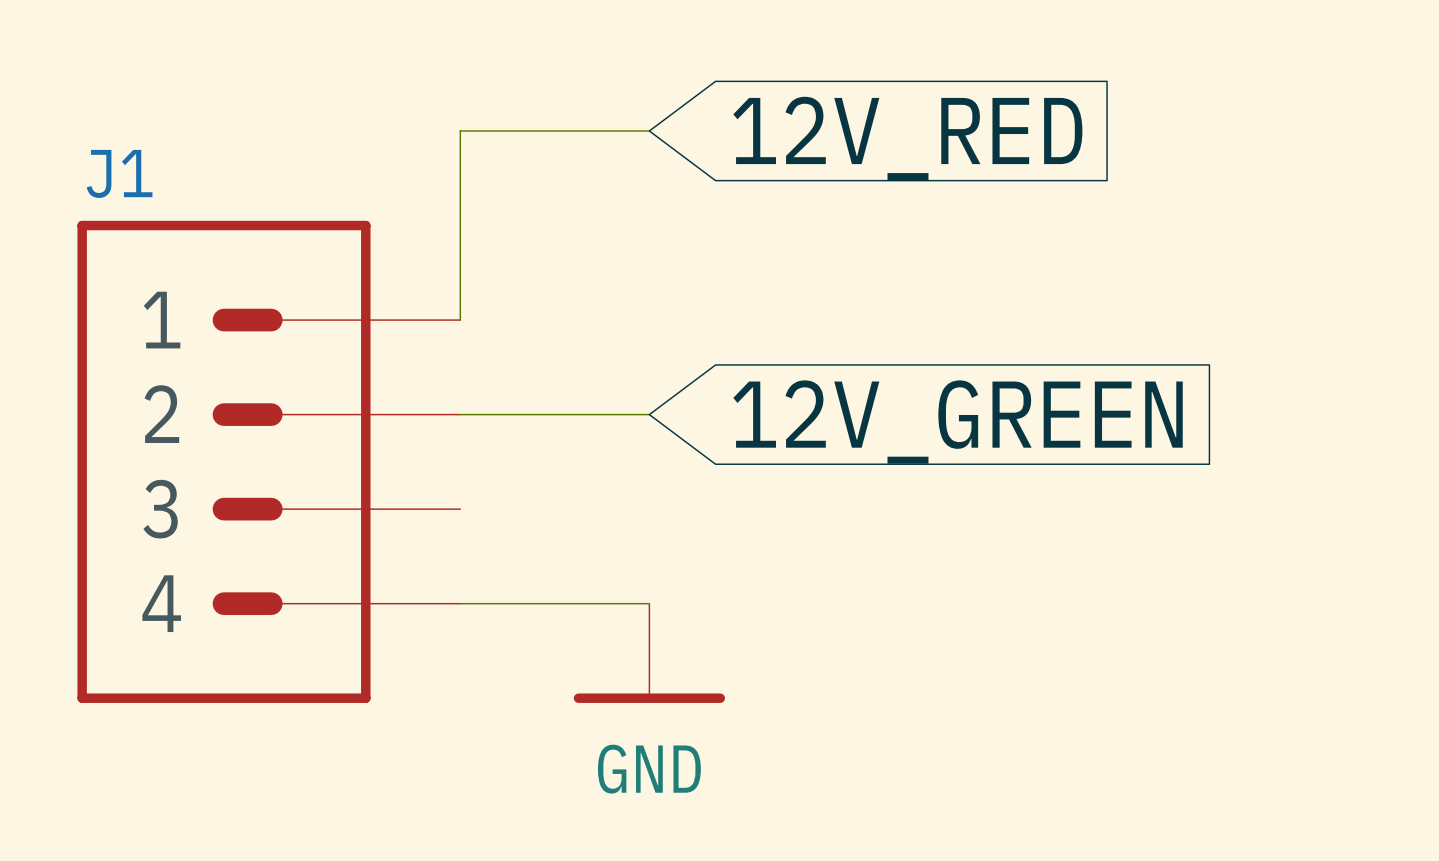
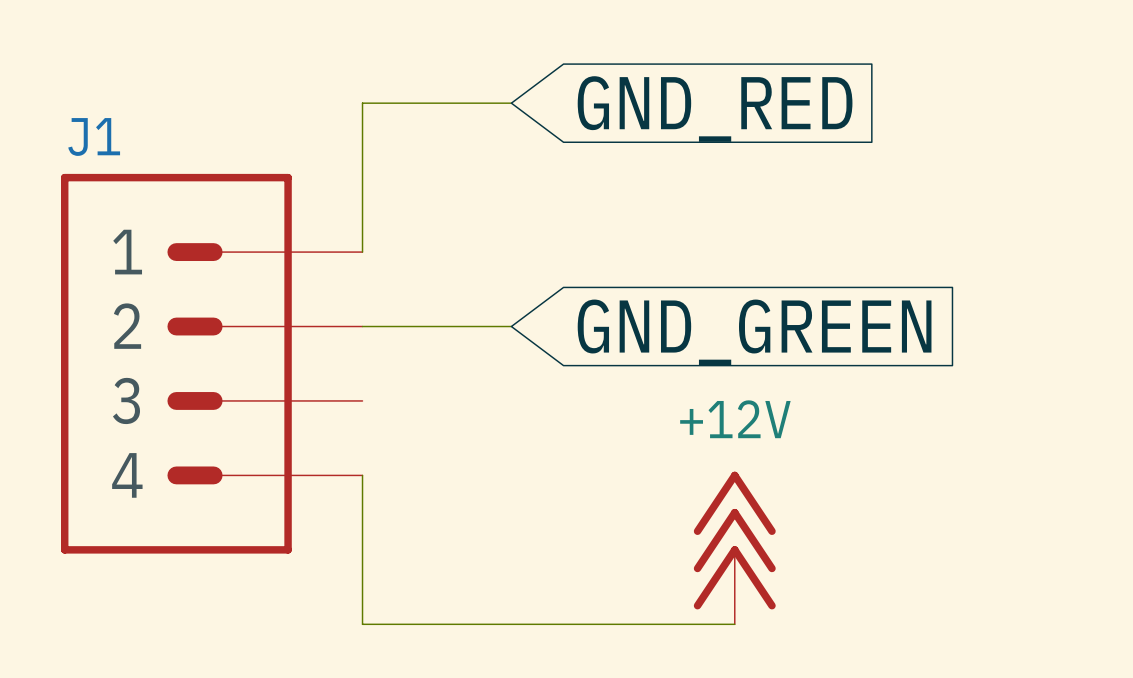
global label: 12V_RED (907, 138) -> GND_RED (715, 109)
global label: 12V_GREEN (958, 422) -> GND_GREEN (754, 332)
wire: (460, 603) (649, 603) -> (362, 475) (362, 624) (734, 624)
power symbol: GND (649, 653) -> none
power symbol: none -> +12V (734, 548)

